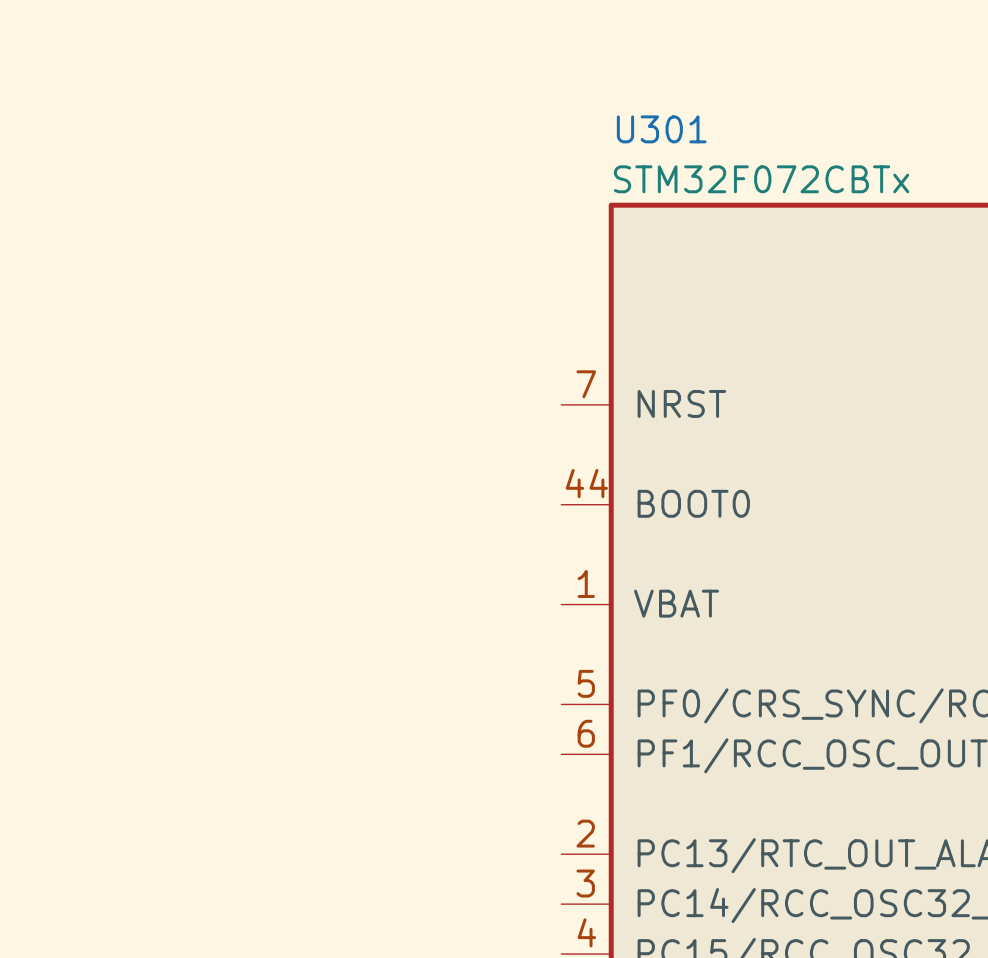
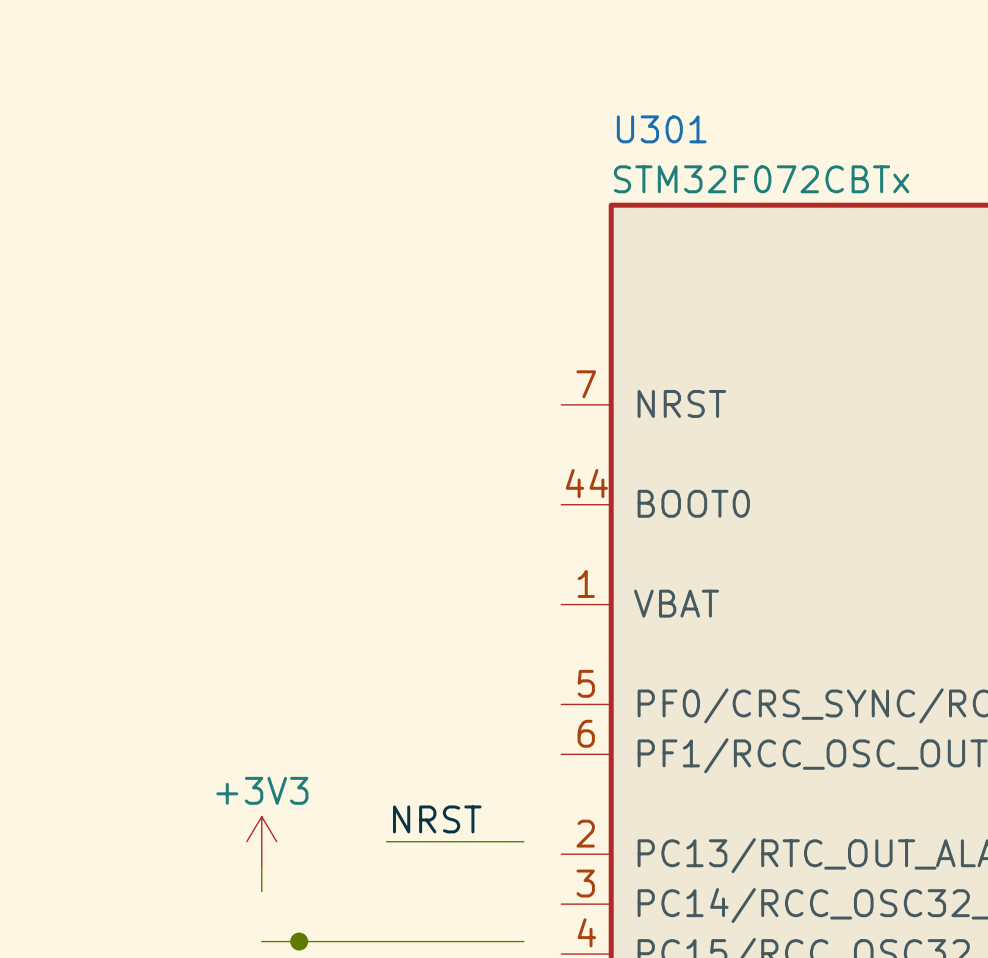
label: none -> NRST (437, 819)
power symbol: none -> +3V3 (261, 841)
wire: none -> (386, 841) (523, 841)
wire: none -> (261, 866) (261, 891)
wire: none -> (261, 941) (523, 941)
junction: none -> (299, 941)

